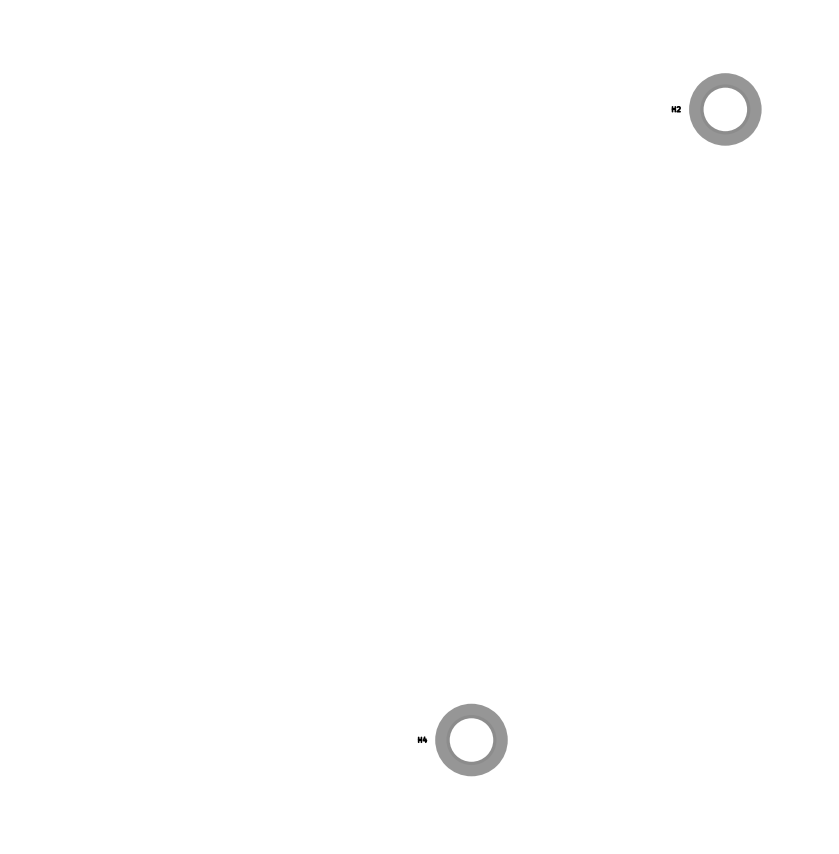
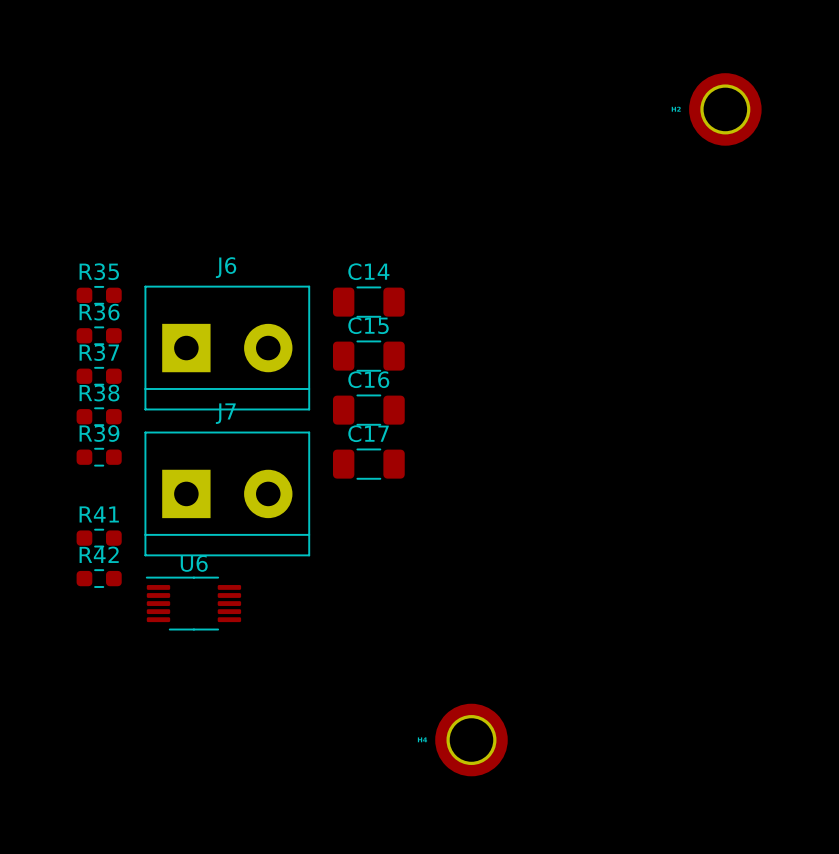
R35: none -> (99, 295)
C14: none -> (368, 302)
R36: none -> (99, 335)
J6: none -> (227, 348)
C15: none -> (368, 356)
R37: none -> (99, 376)
C16: none -> (368, 410)
R38: none -> (99, 416)
R39: none -> (99, 457)
C17: none -> (368, 464)
J7: none -> (227, 493)
R41: none -> (99, 538)
R42: none -> (99, 578)
U6: none -> (193, 603)

